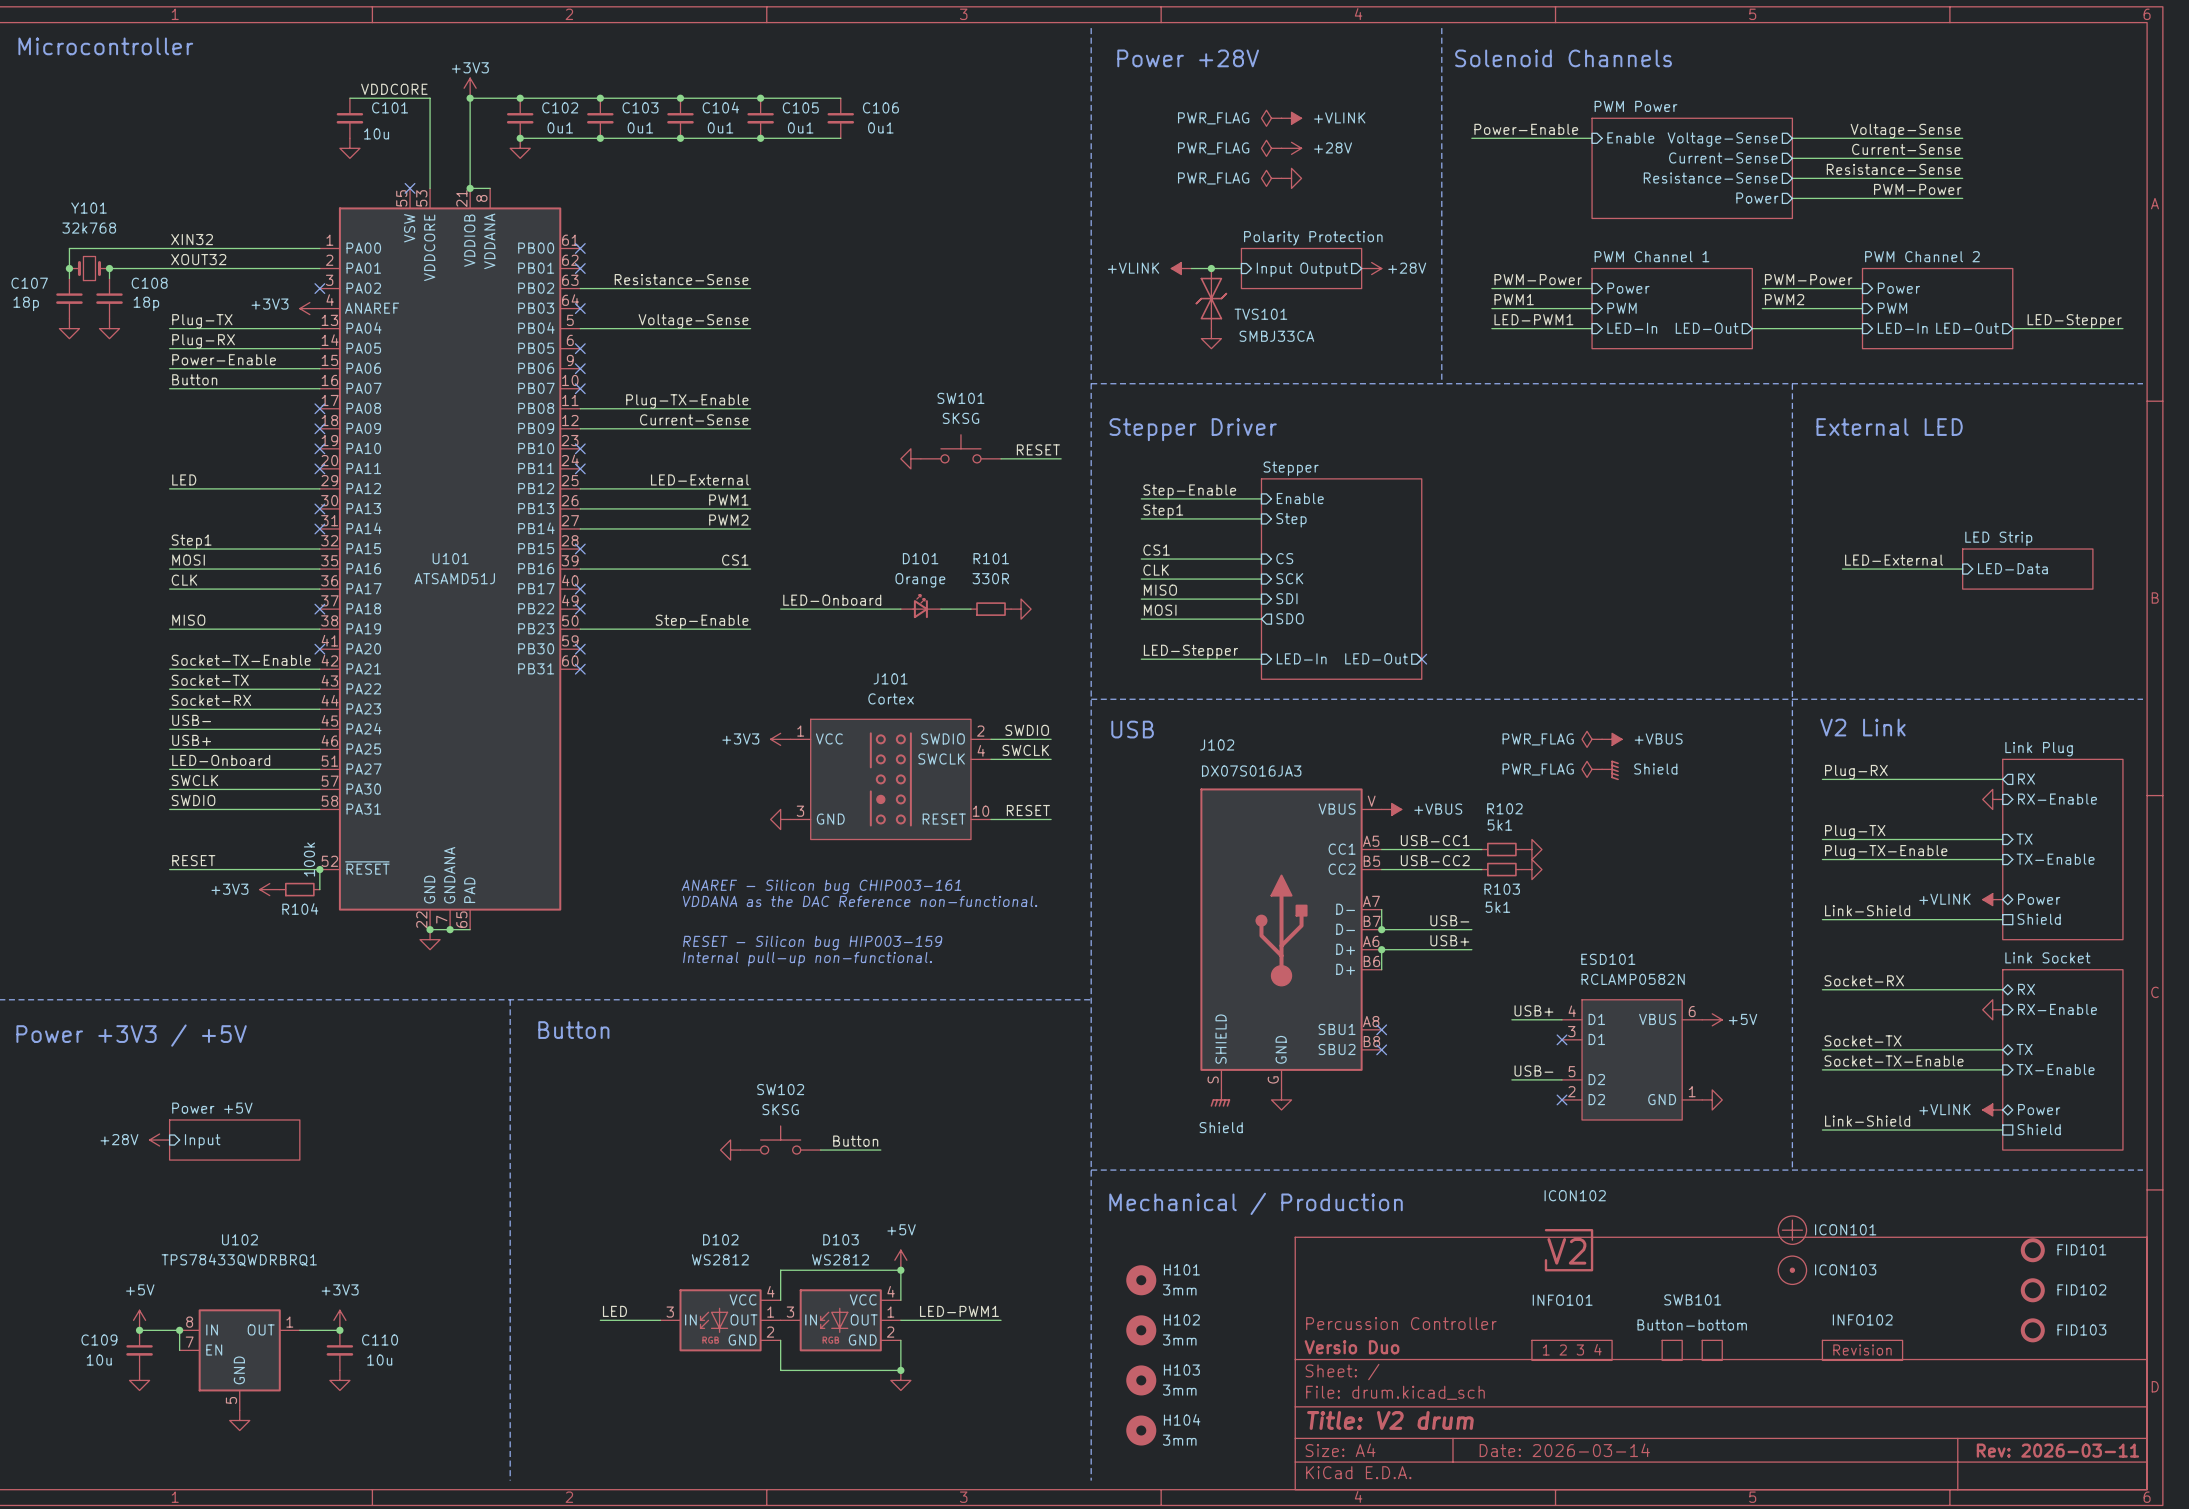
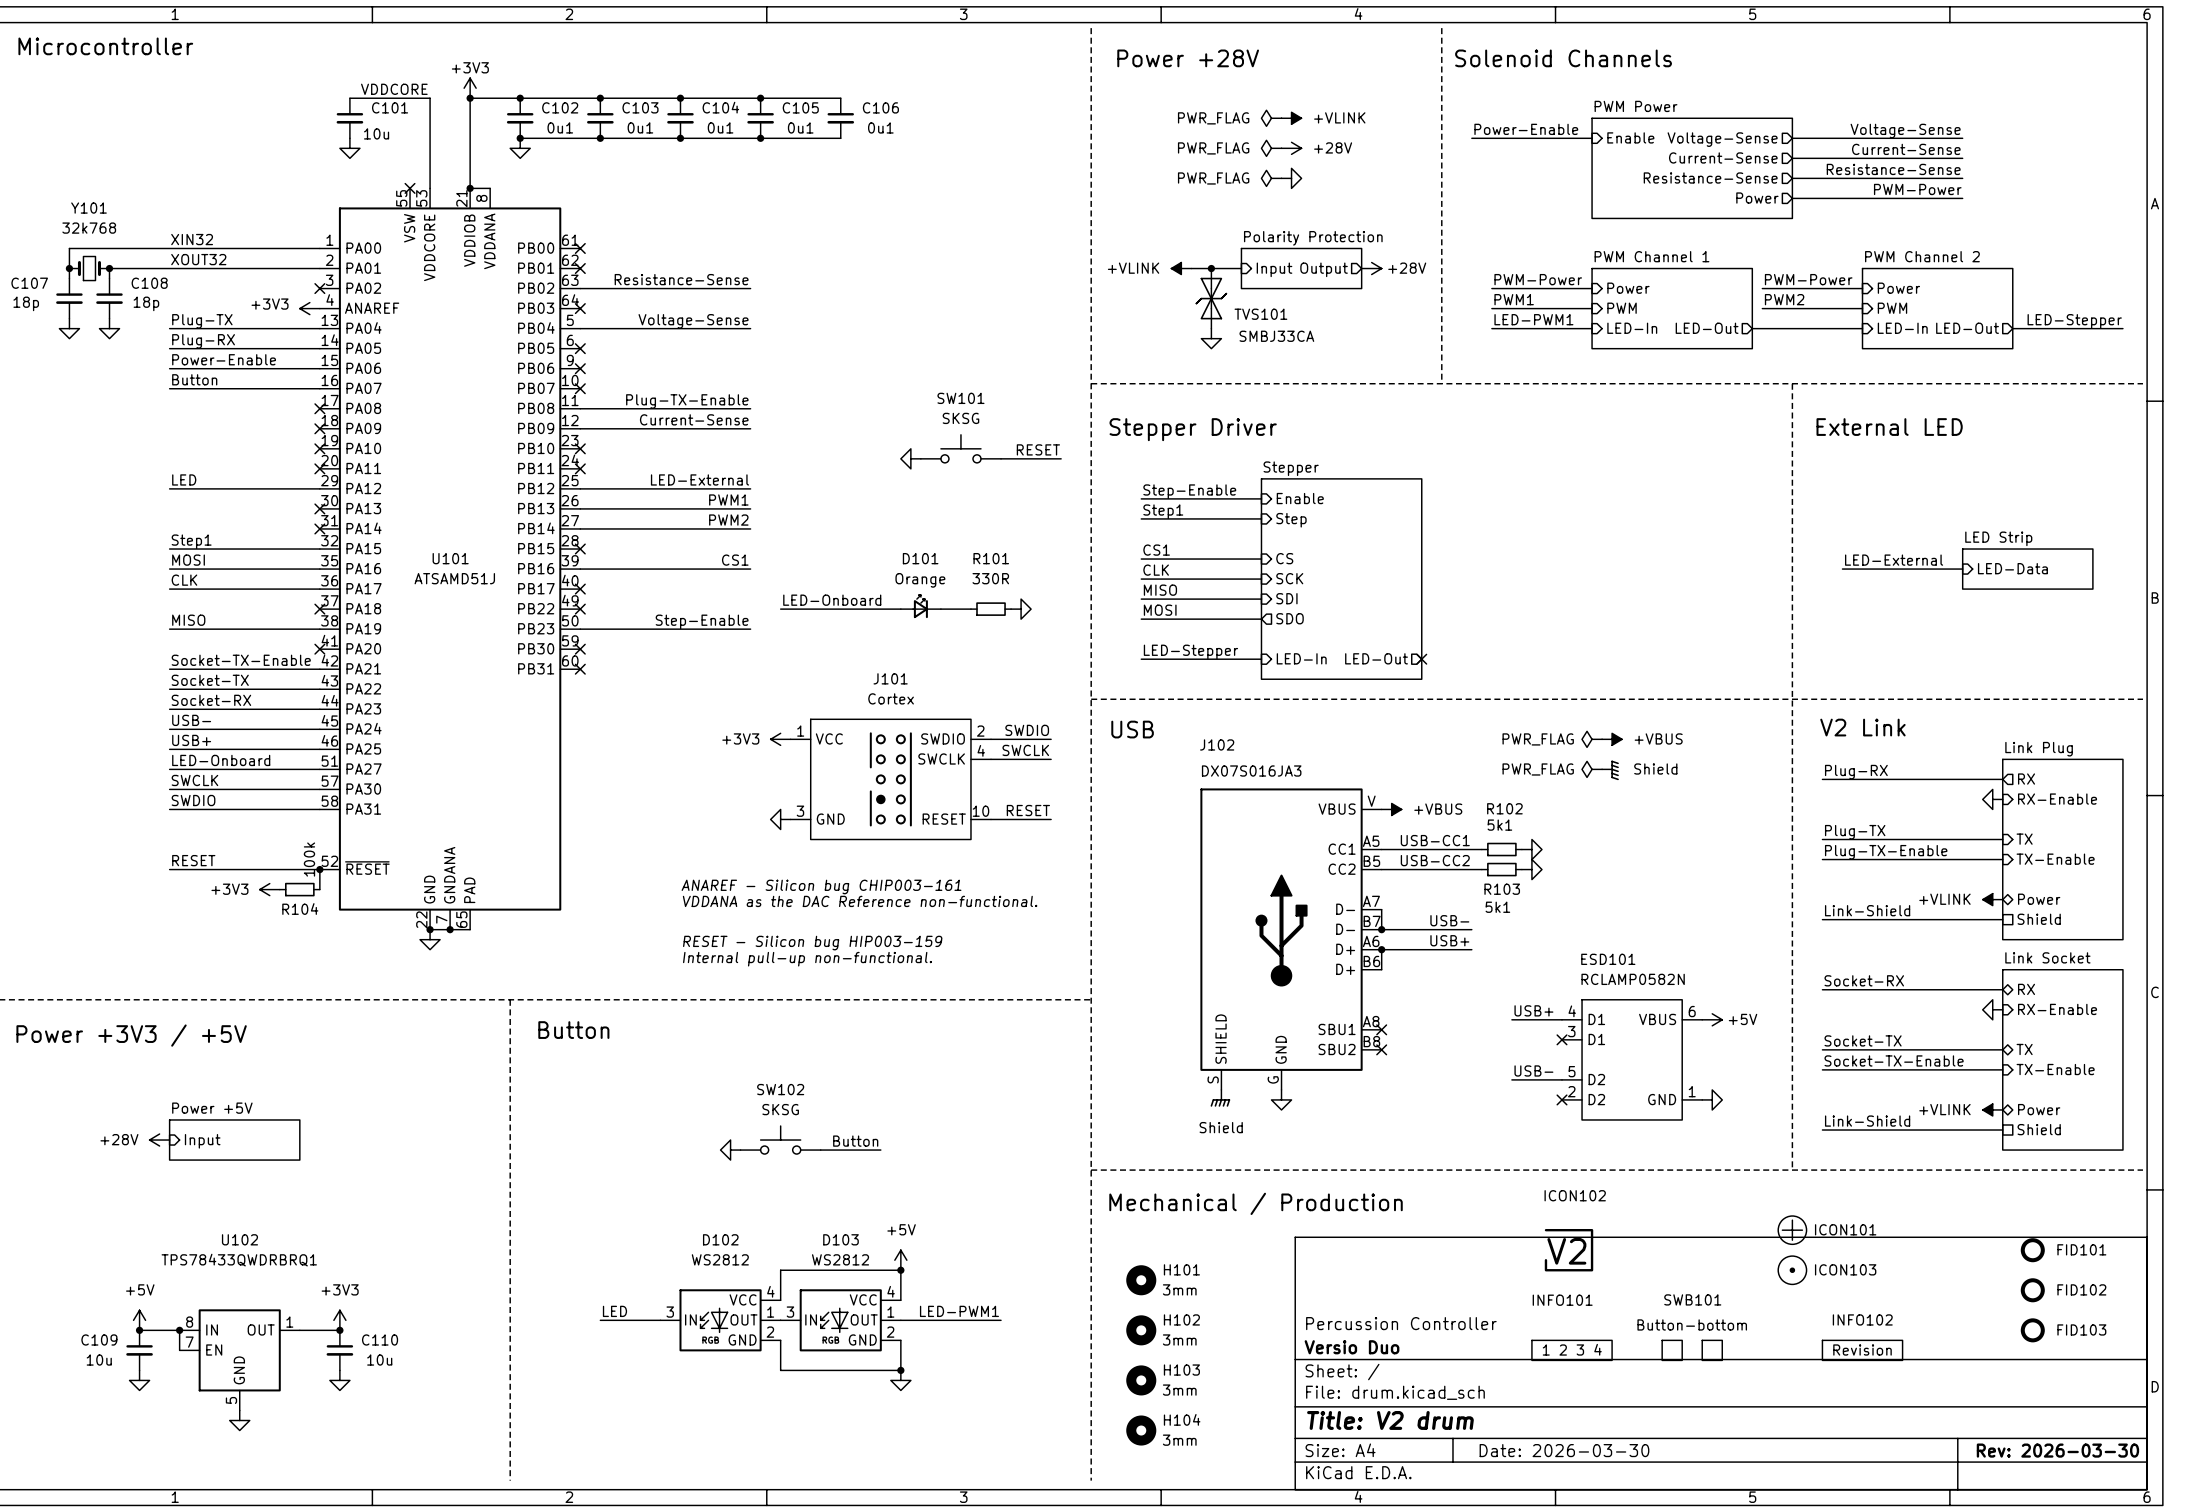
title block: Date: 2026-03-14 (1564, 1450) -> Date: 2026-03-30 (1564, 1450)
title block: Rev: 2026-03-11 (2057, 1450) -> Rev: 2026-03-30 (2057, 1450)

